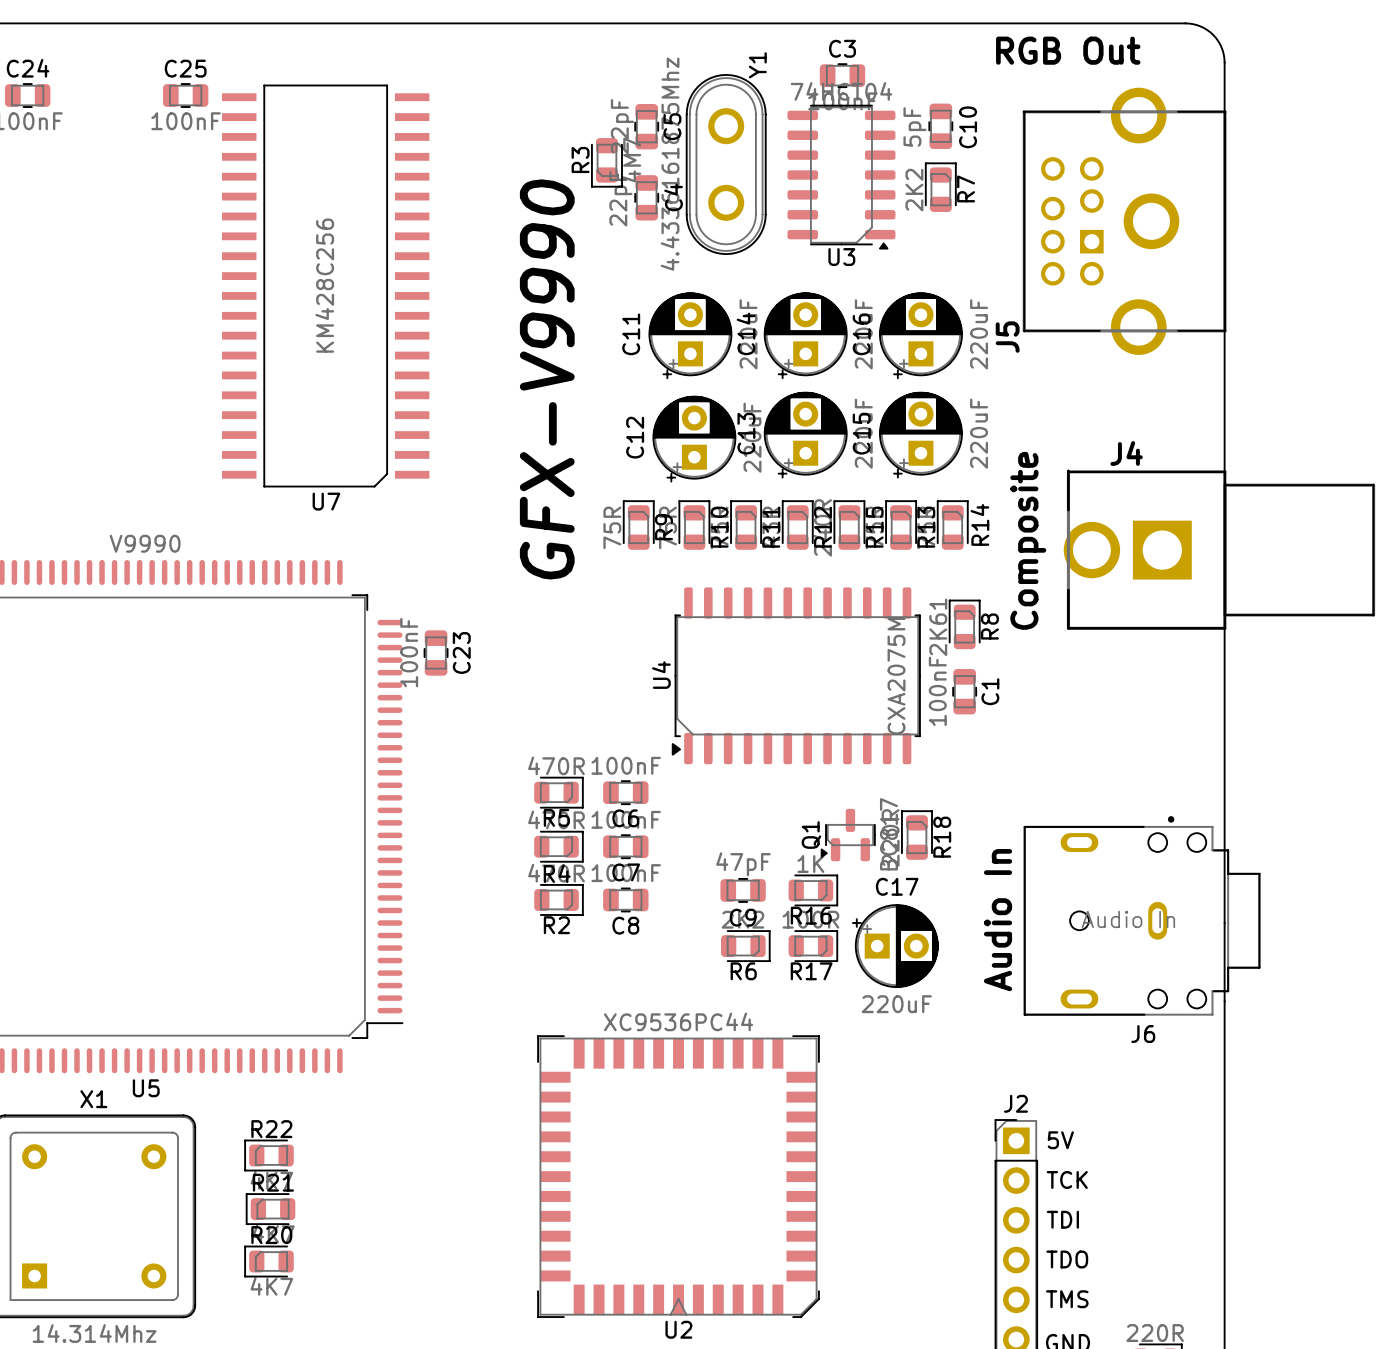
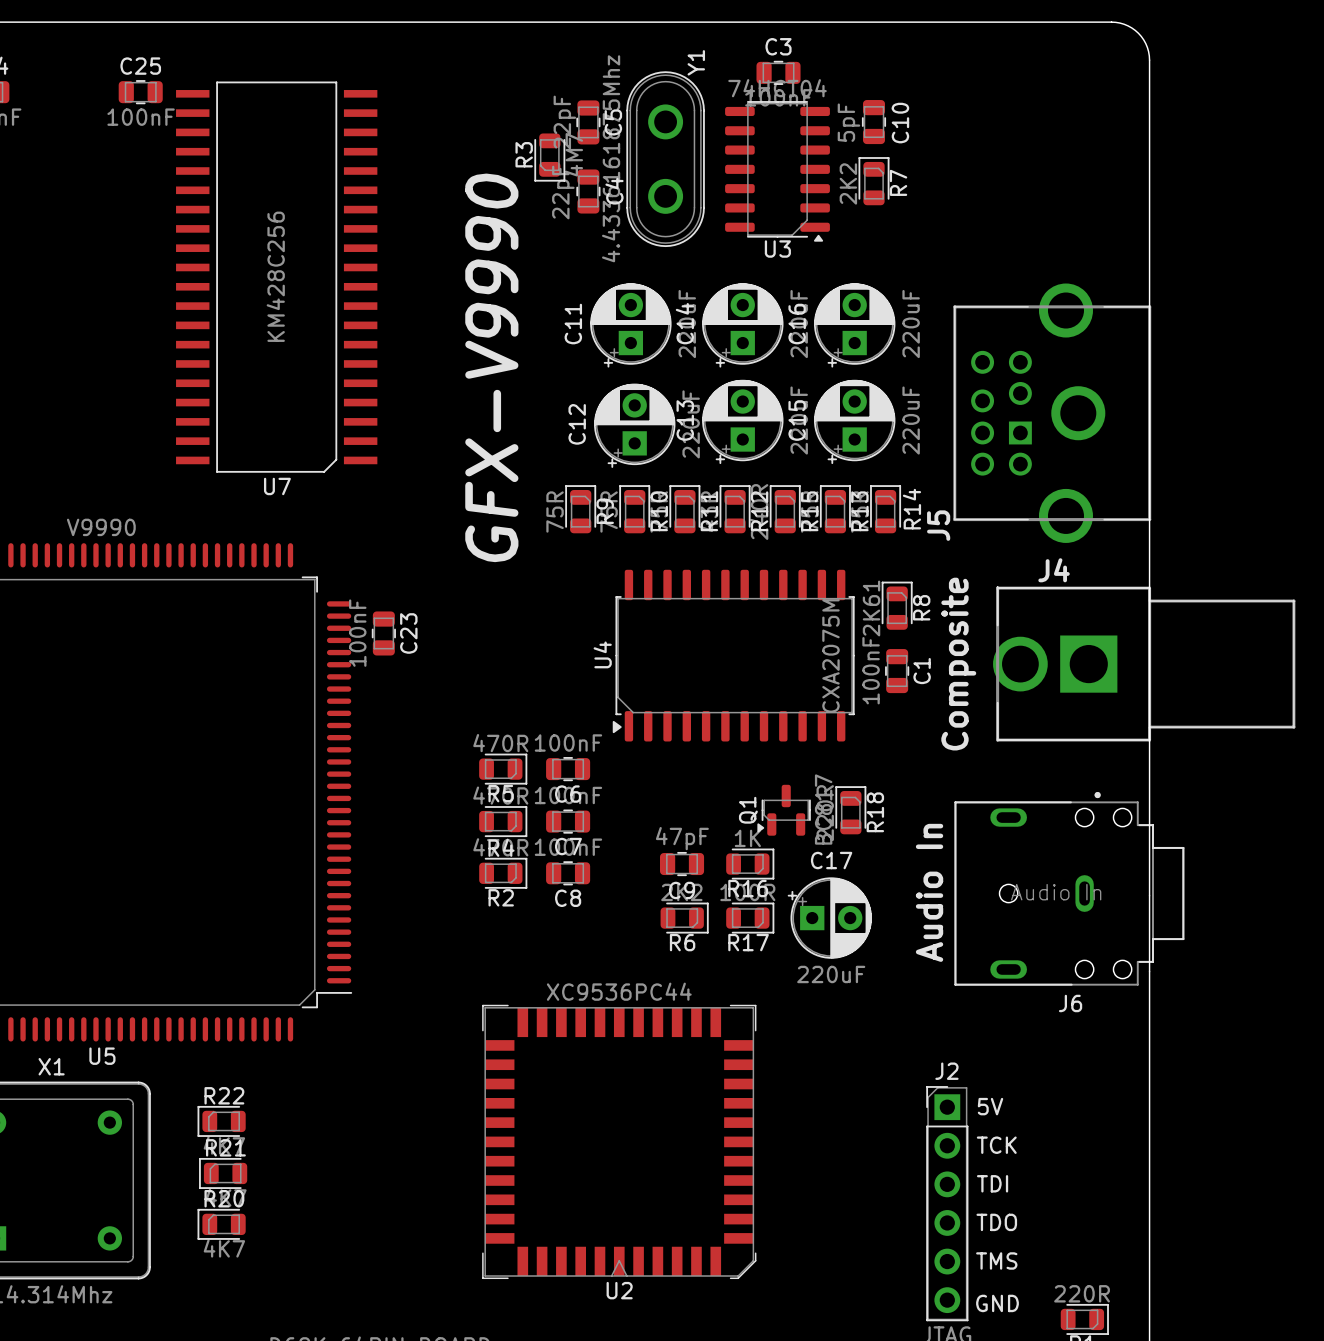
text: RGB Out (1068, 50) -> none
J5 position: (1124, 221) -> (1052, 413)
text position: Composite (1028, 540) -> Composite (958, 664)
J4 position: (1219, 549) -> (1144, 663)

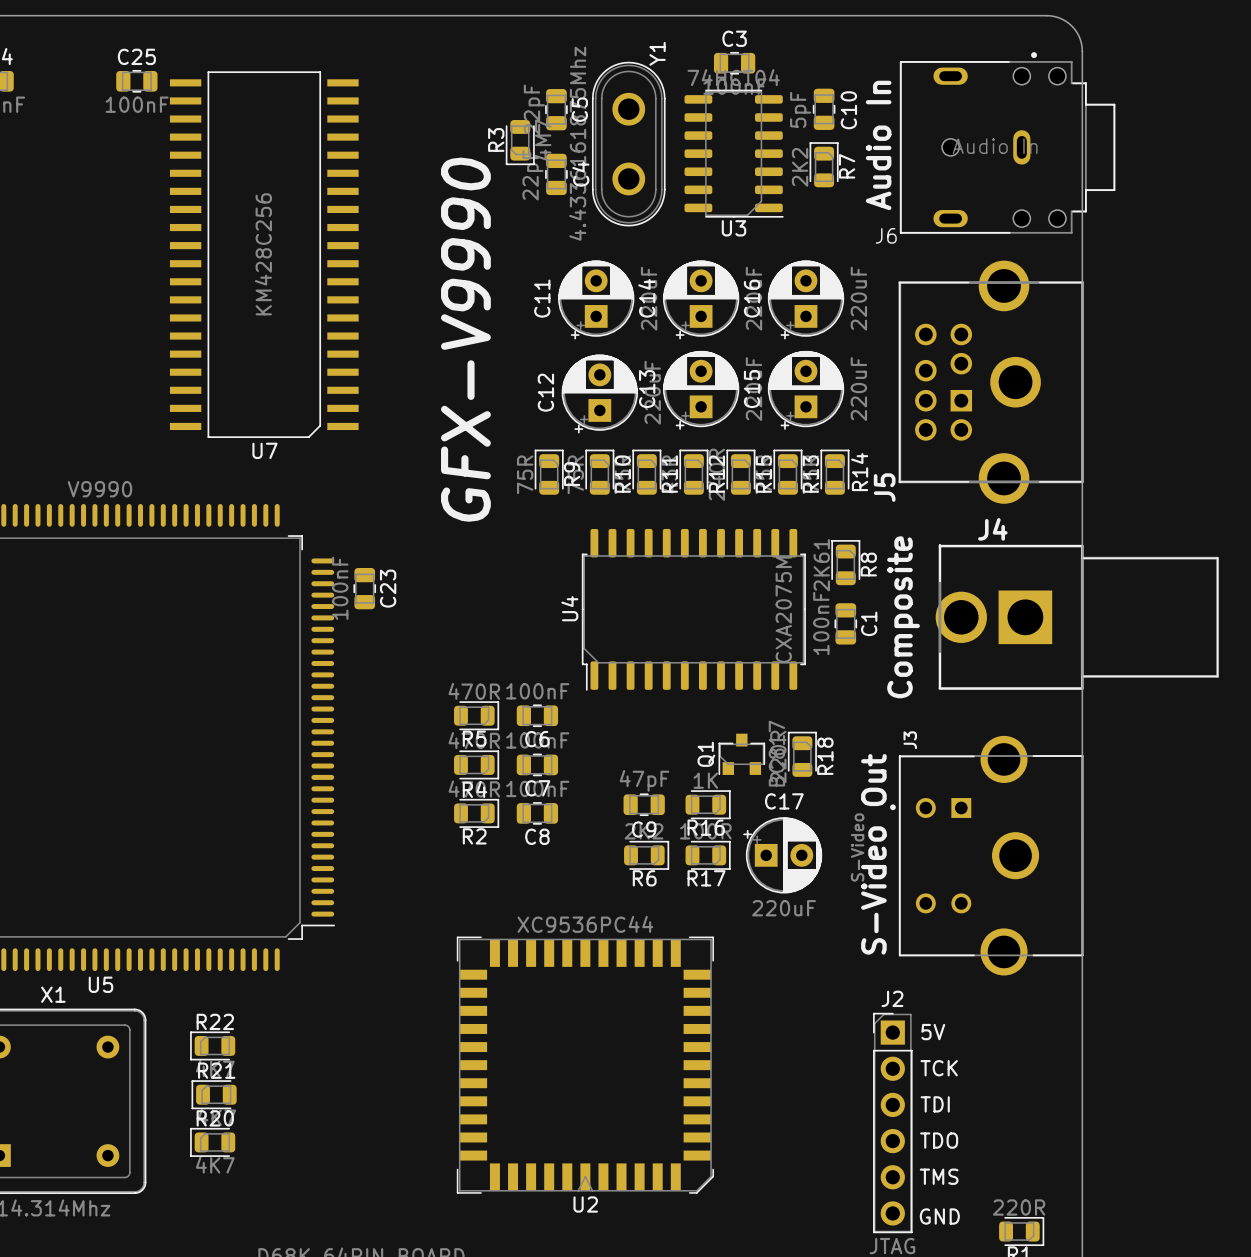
U3 footprint: [725, 101, 830, 242] -> [684, 89, 784, 218]
text: none -> Audio In (878, 145)
U4 footprint: [612, 569, 855, 742] -> [581, 528, 806, 691]
Q1 footprint: [757, 784, 811, 836] -> [718, 733, 766, 776]
J6 position: (1069, 888) -> (1007, 143)
text: Audio In (929, 892) -> none
text: none -> S-Video Out (873, 854)
J3: none -> S-Video (986, 855)
J6 name position: J6 (1070, 1003) -> J6 (886, 235)

